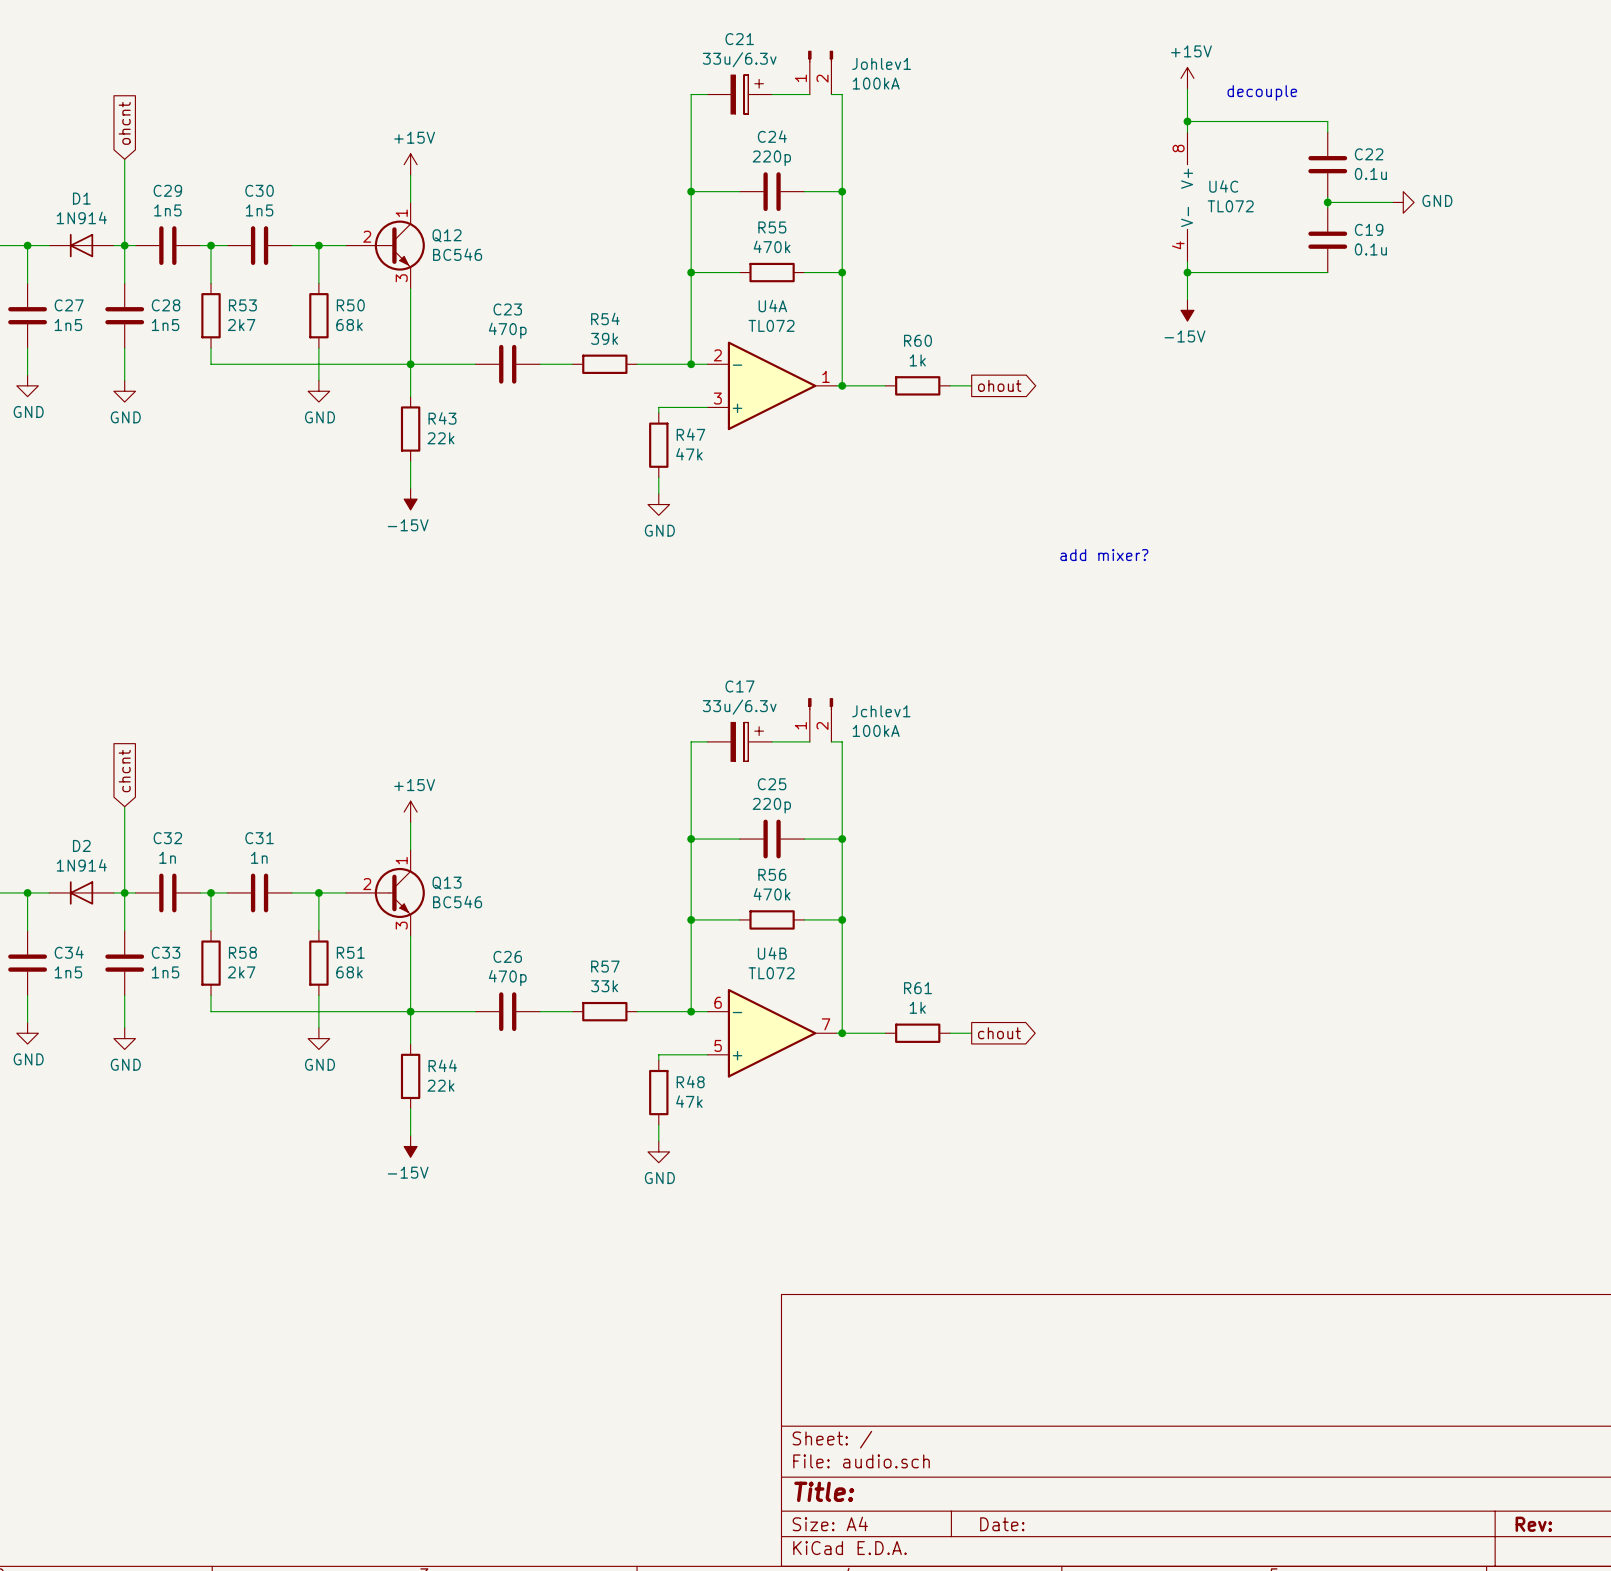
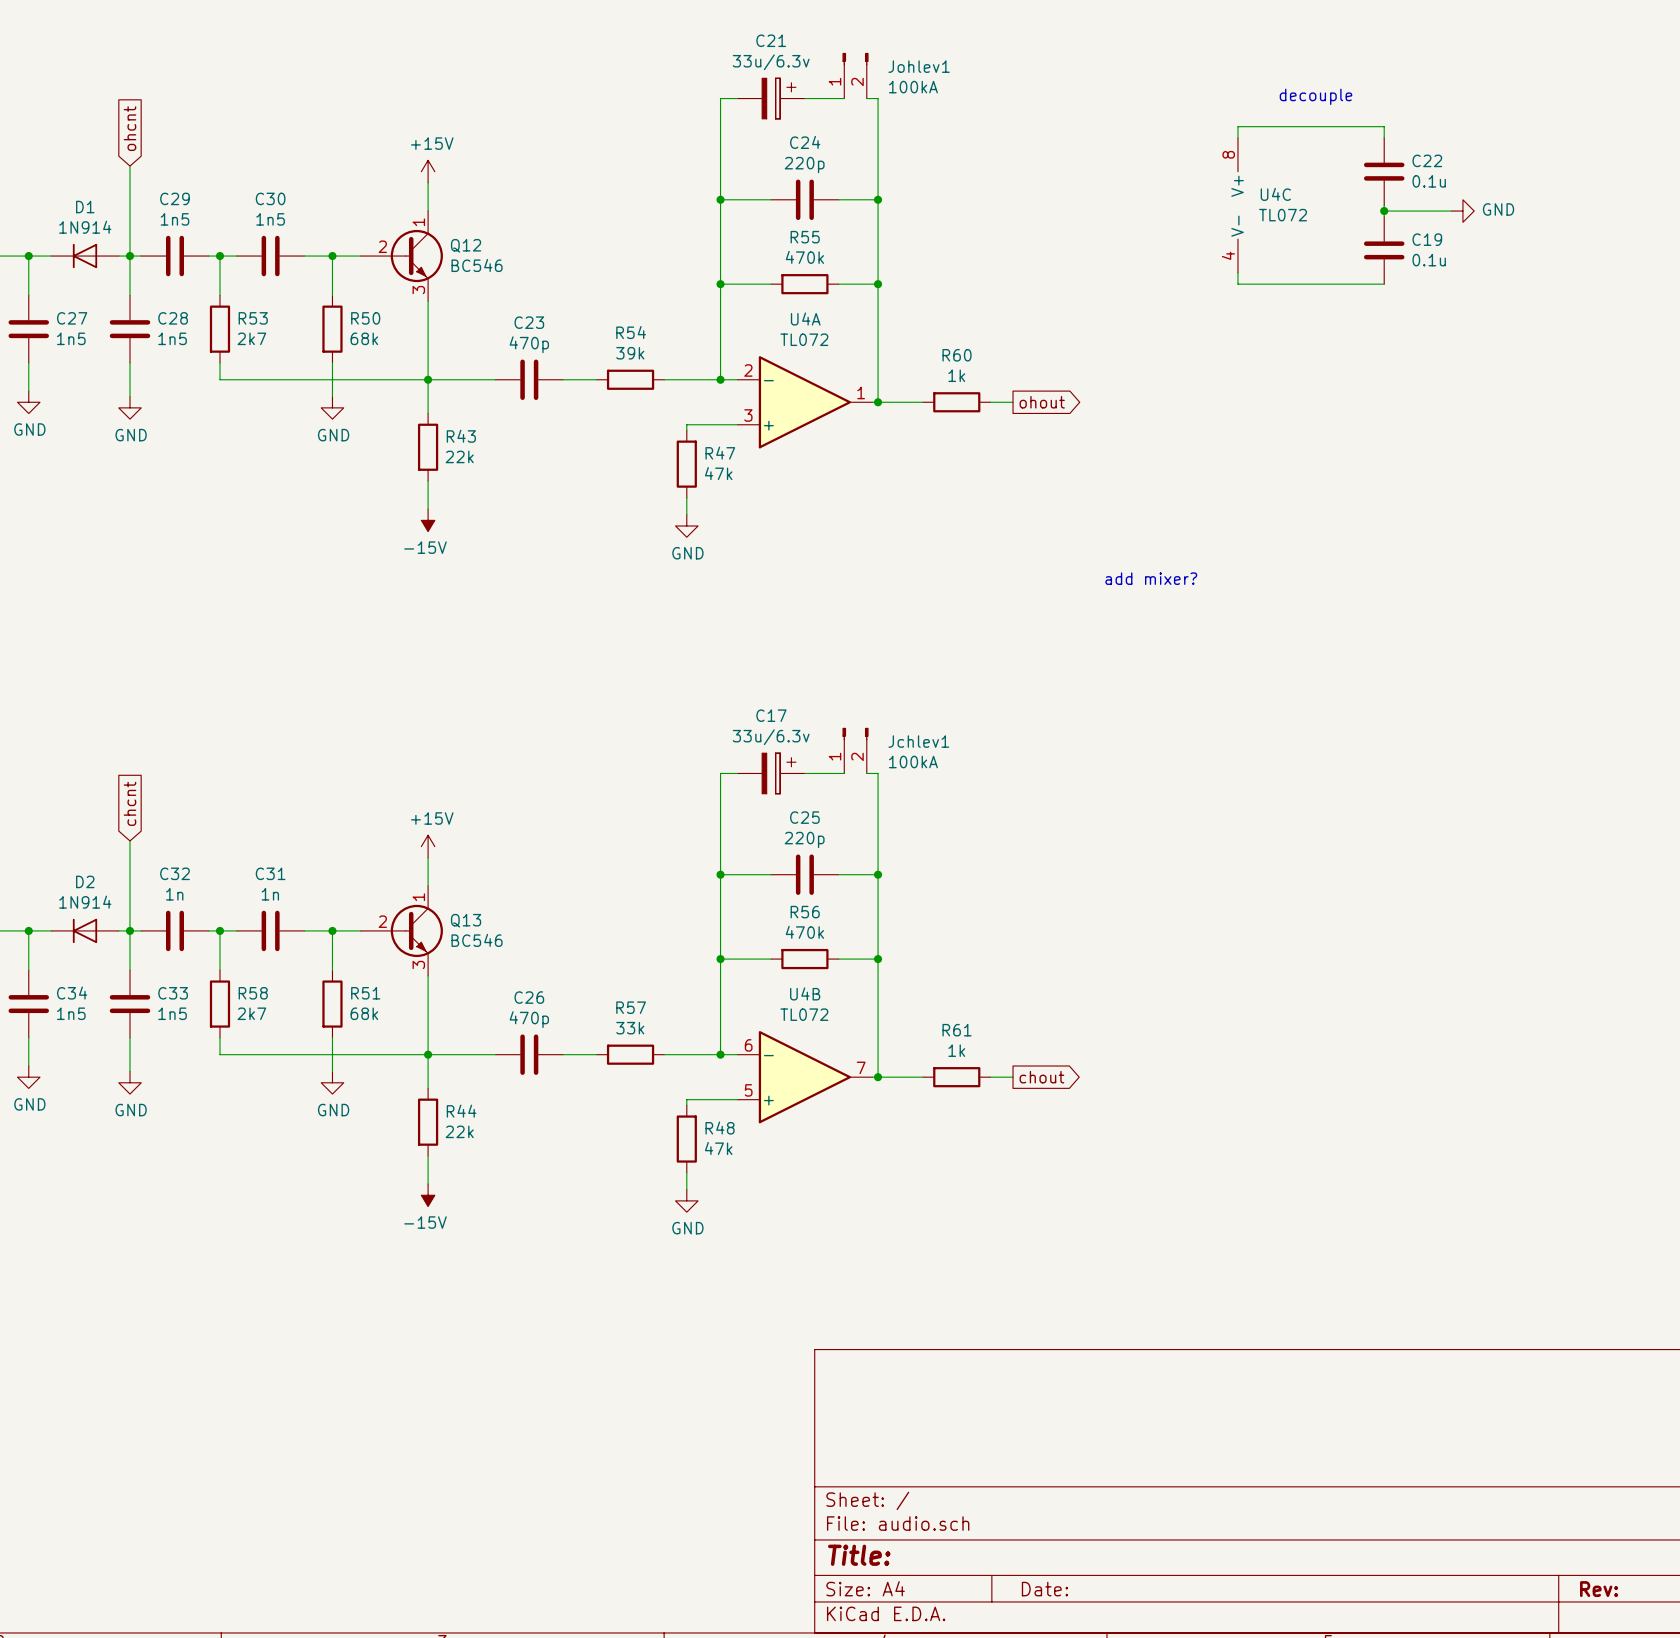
power symbol: +15V (1187, 78) -> none
wire: (1187, 89) (1187, 121) -> none
junction: (1187, 121) -> none
wire: (1187, 272) (1187, 299) -> none
junction: (1187, 272) -> none
power symbol: -15V (1187, 310) -> none

